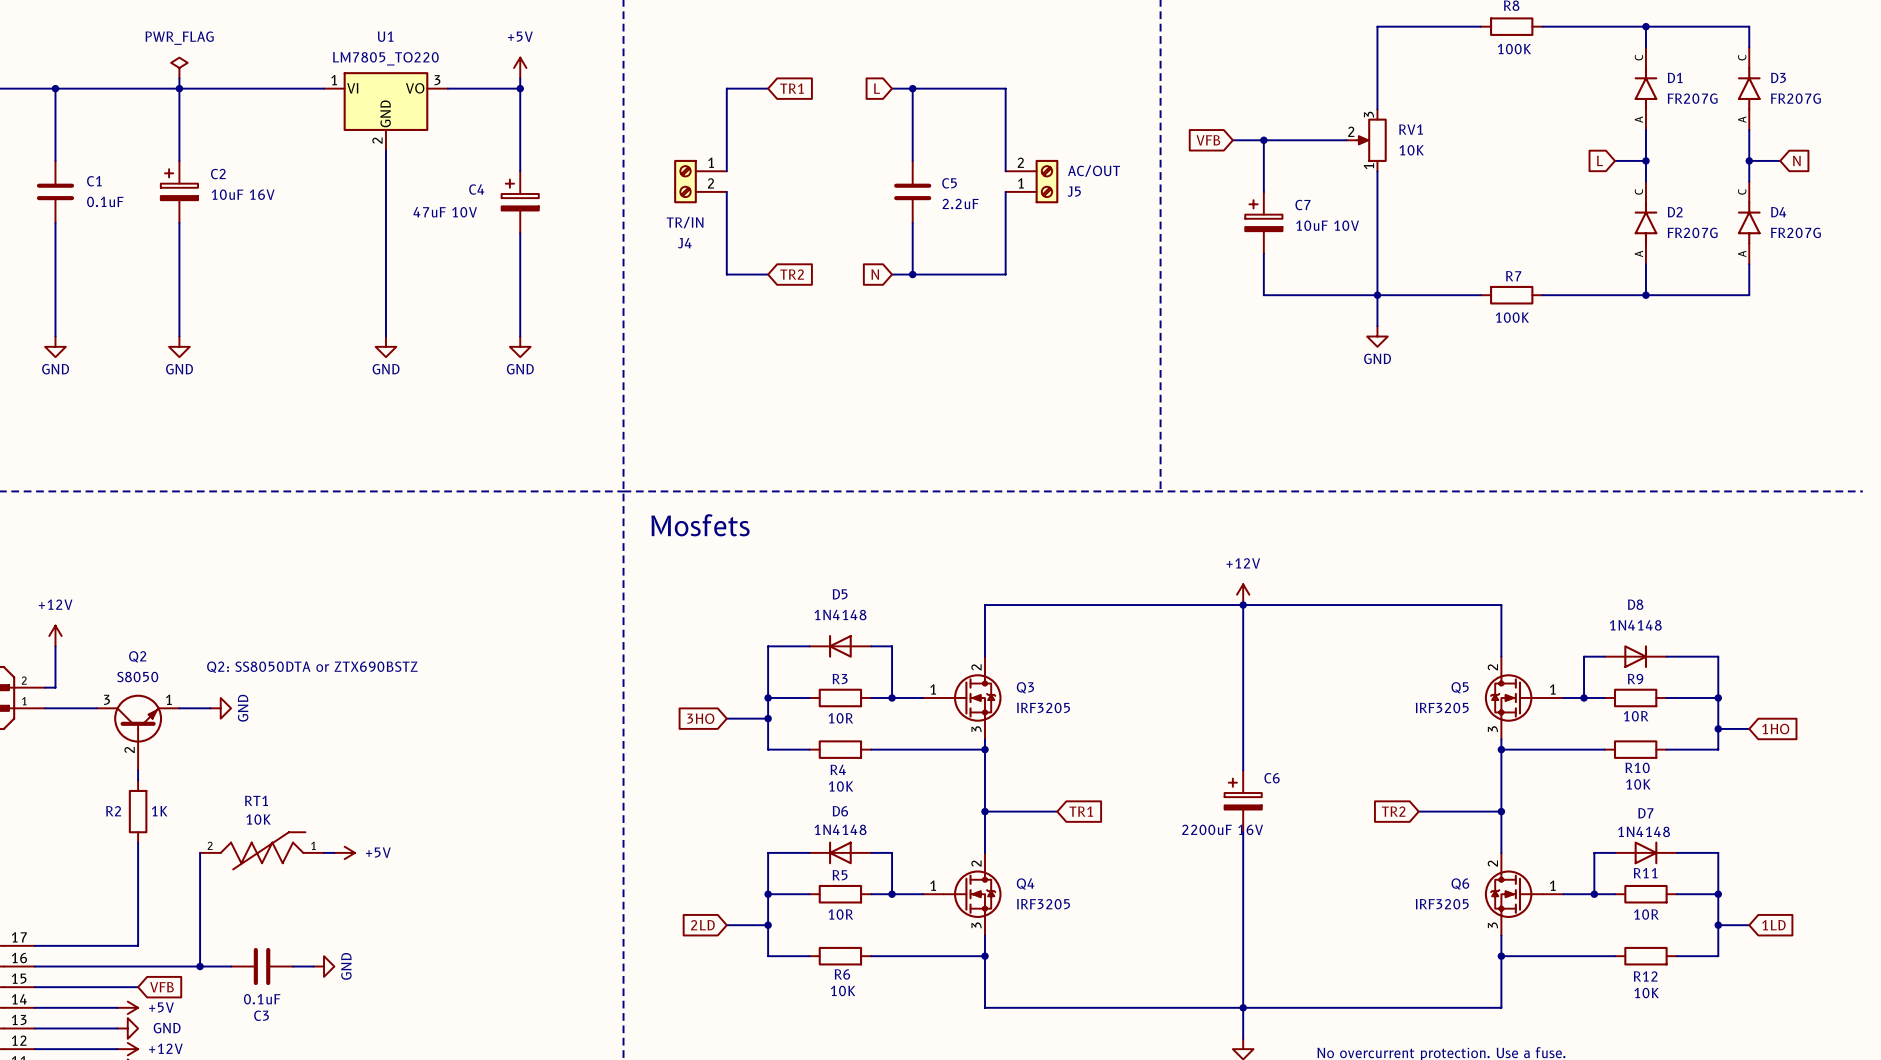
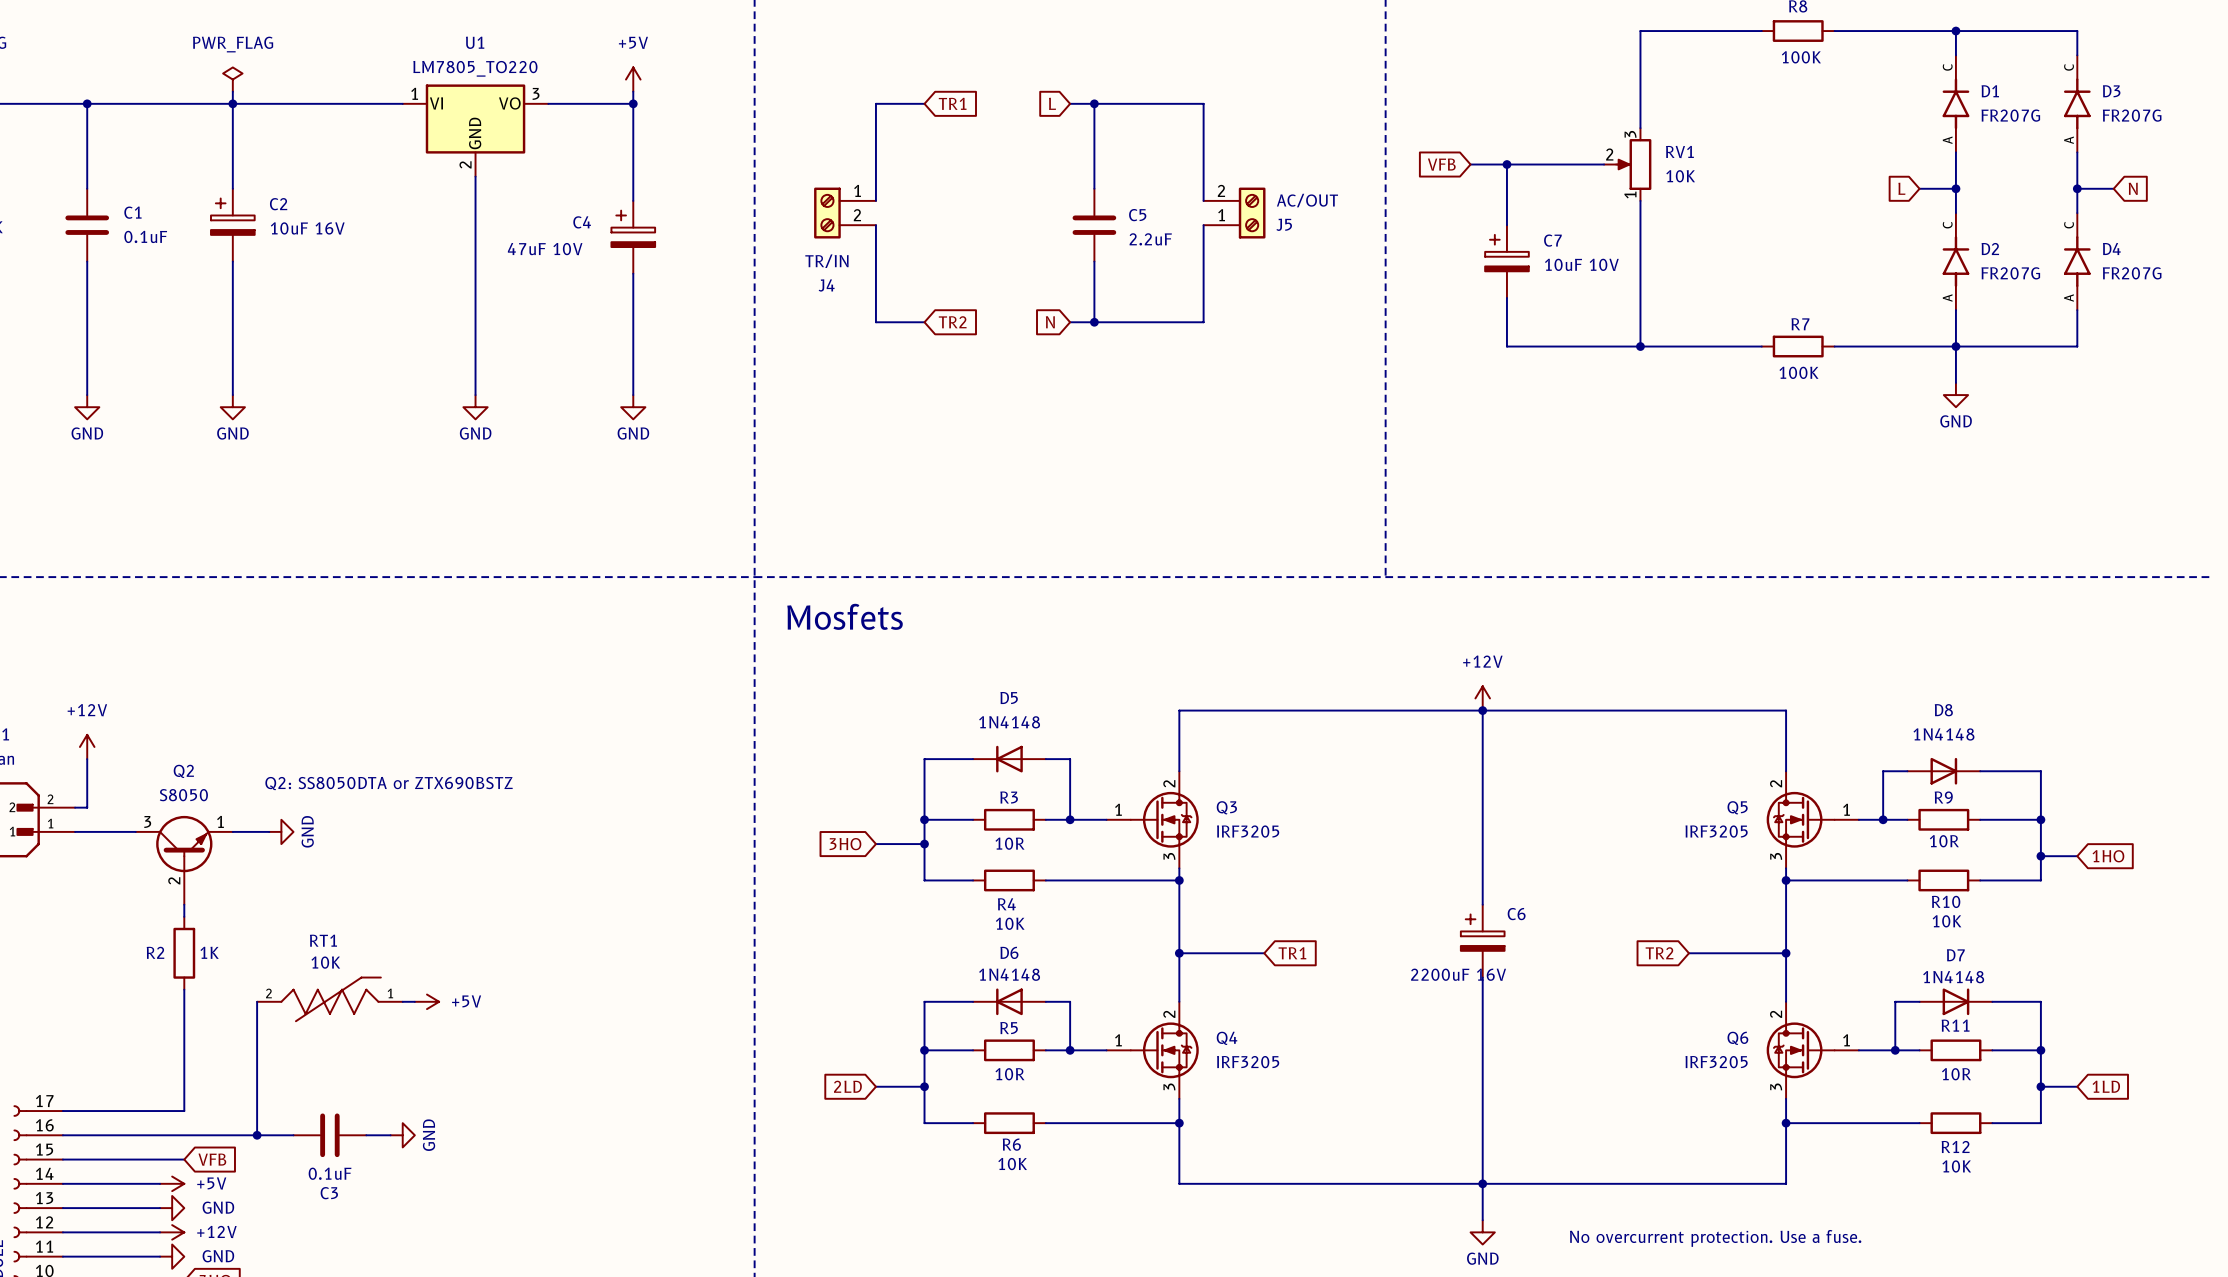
wire: (1377, 295) (1377, 326) -> none
wire: none -> (1955, 346) (1955, 382)
power symbol: GND (1377, 336) -> none
power symbol: none -> GND (1955, 395)

